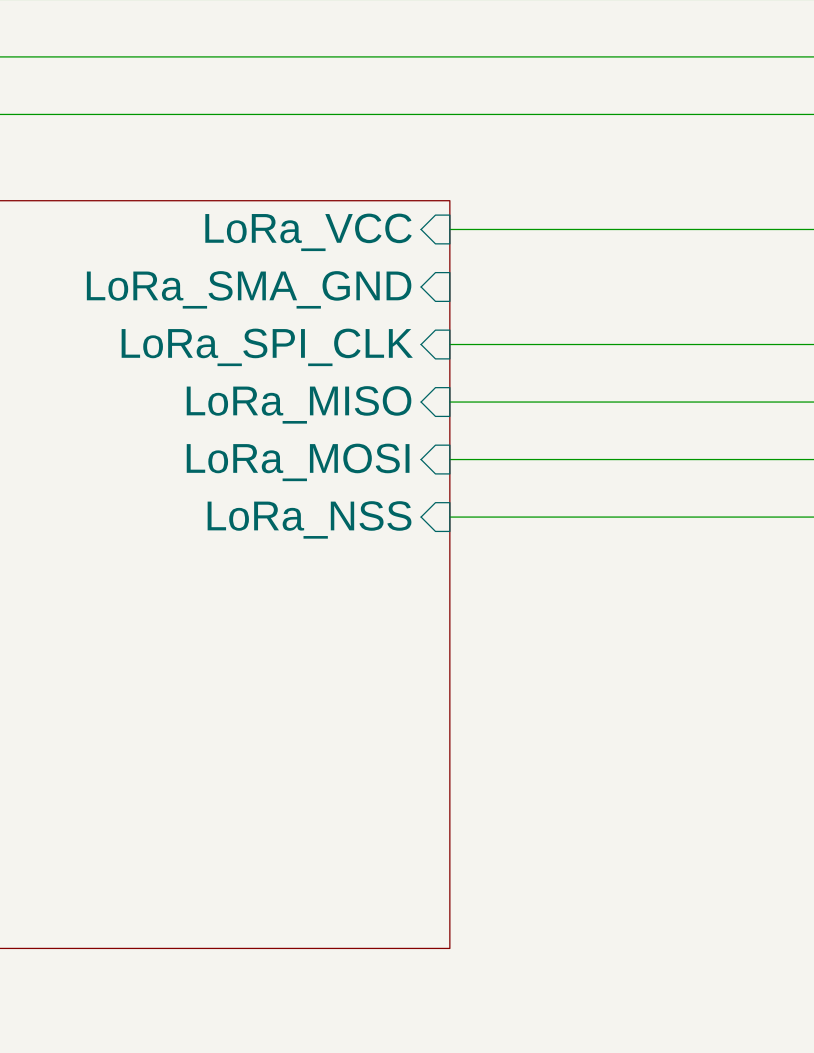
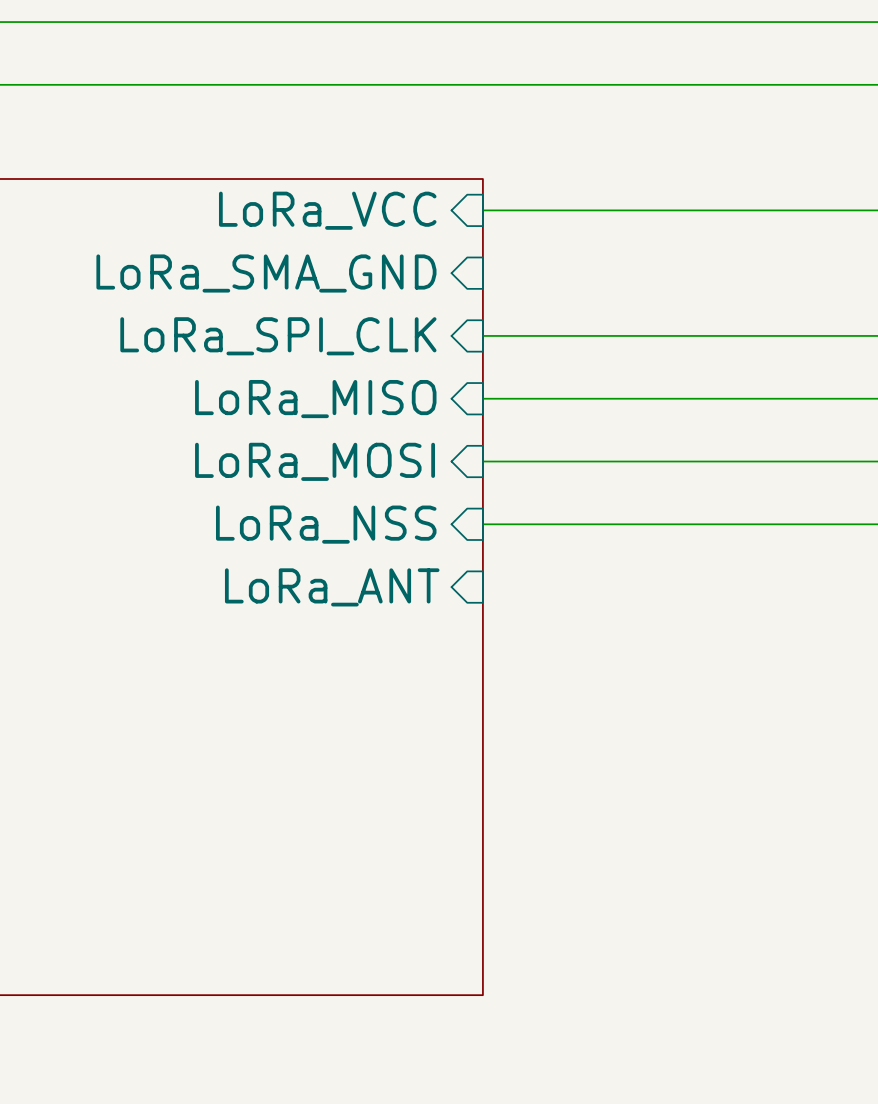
sheet pin: none -> LoRa_ANT (332, 587)

